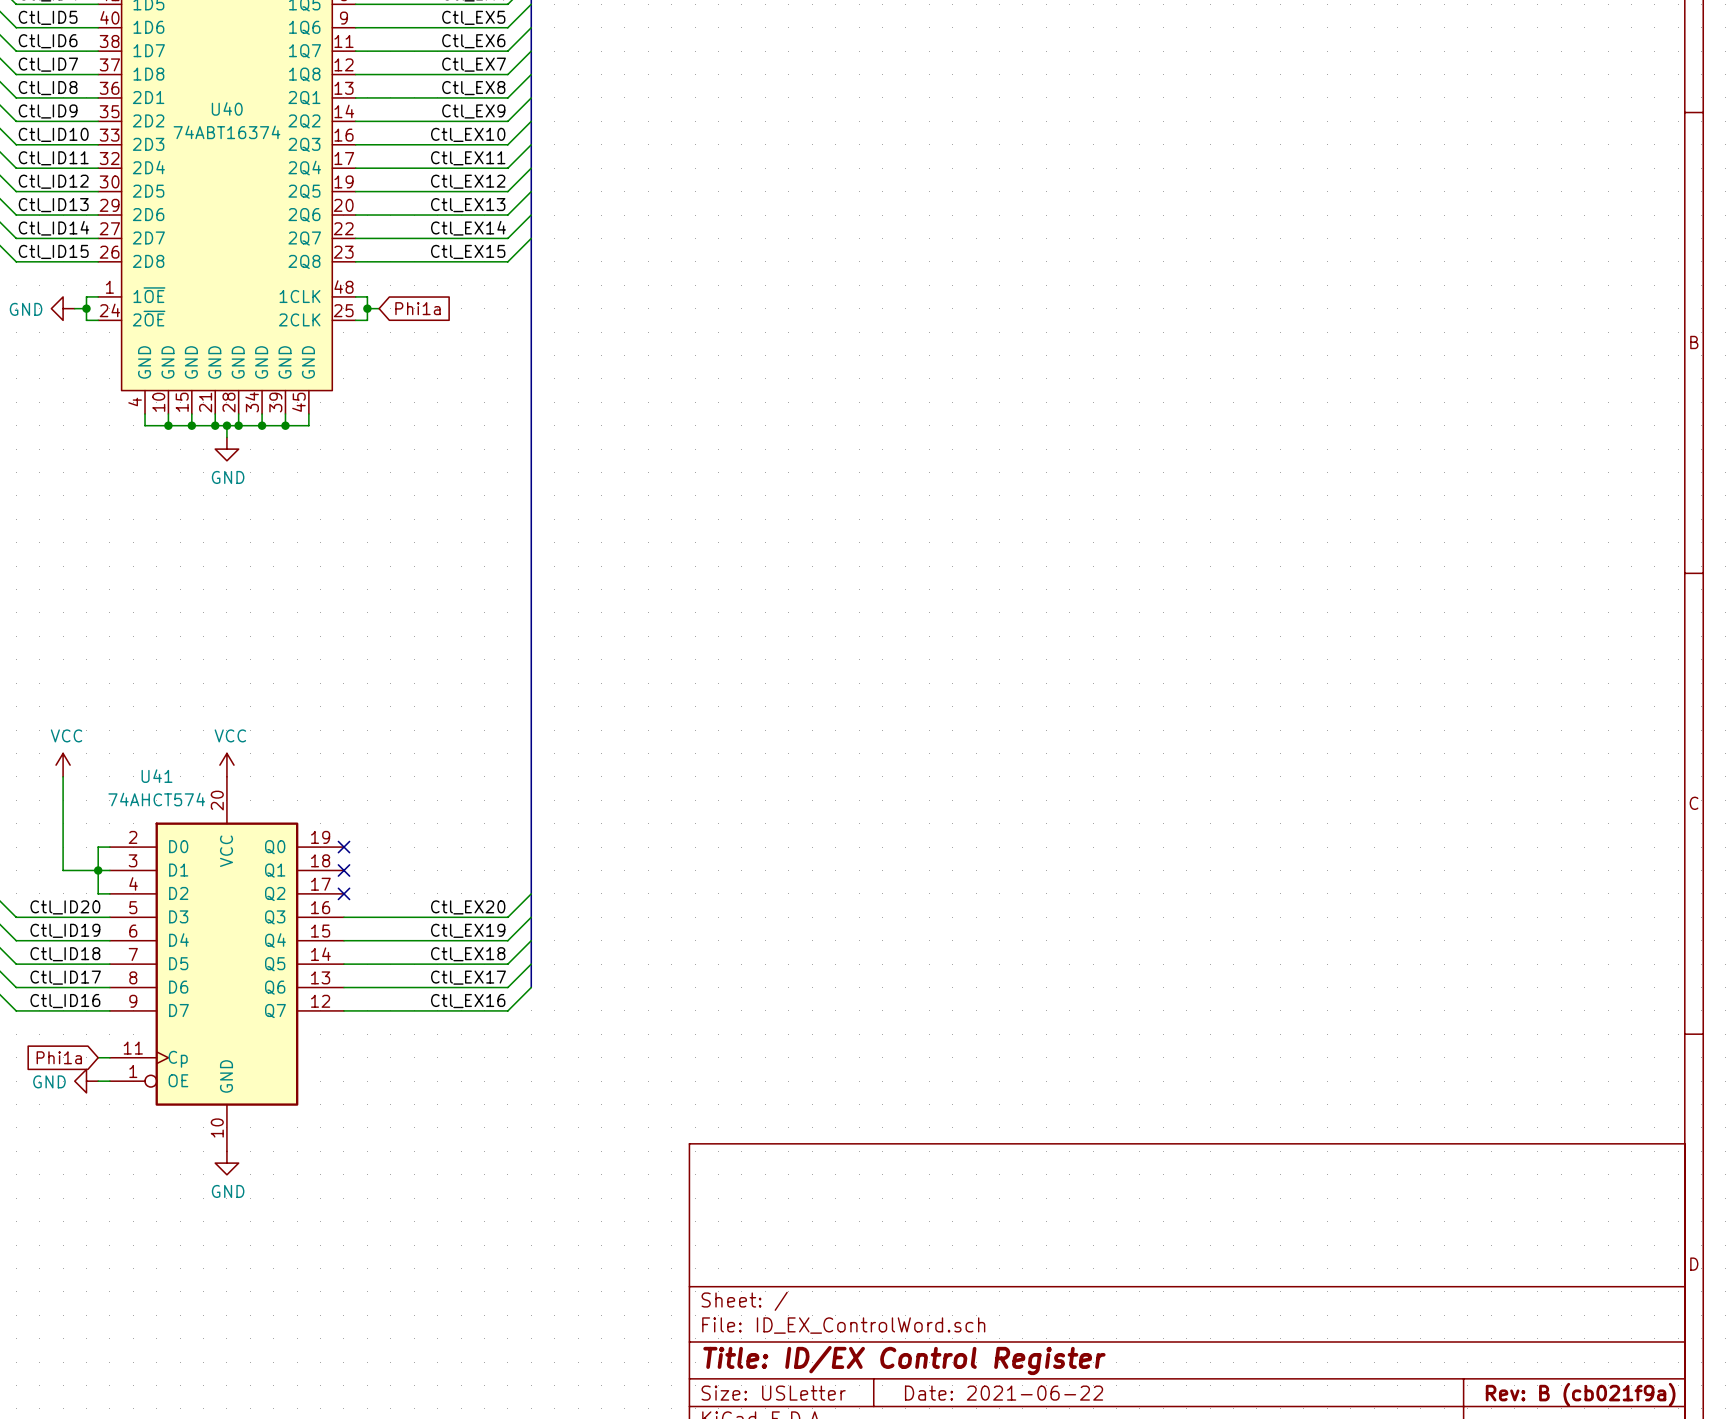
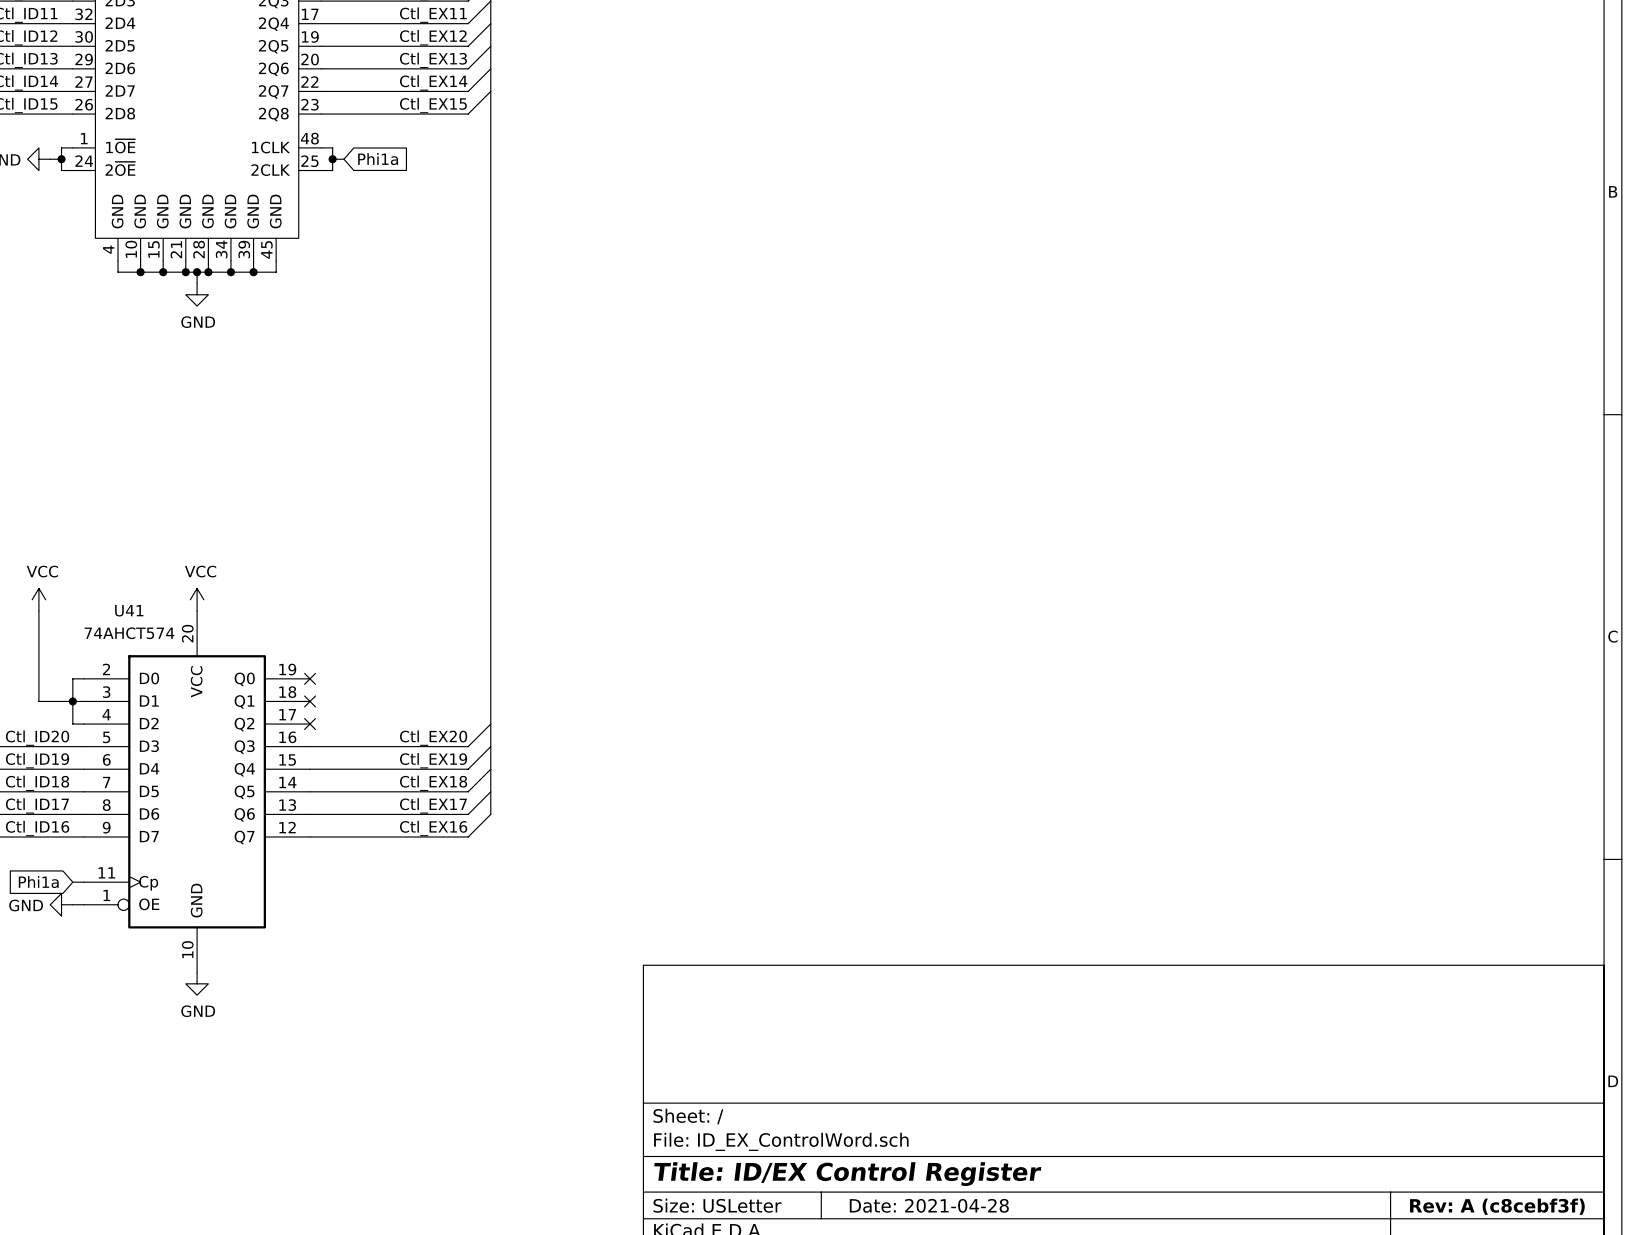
title block: Date: 2021-06-22 (1004, 1393) -> Date: 2021-04-28 (929, 1205)
title block: Rev: B (cb021f9a) (1580, 1394) -> Rev: A (c8cebf3f) (1497, 1206)

